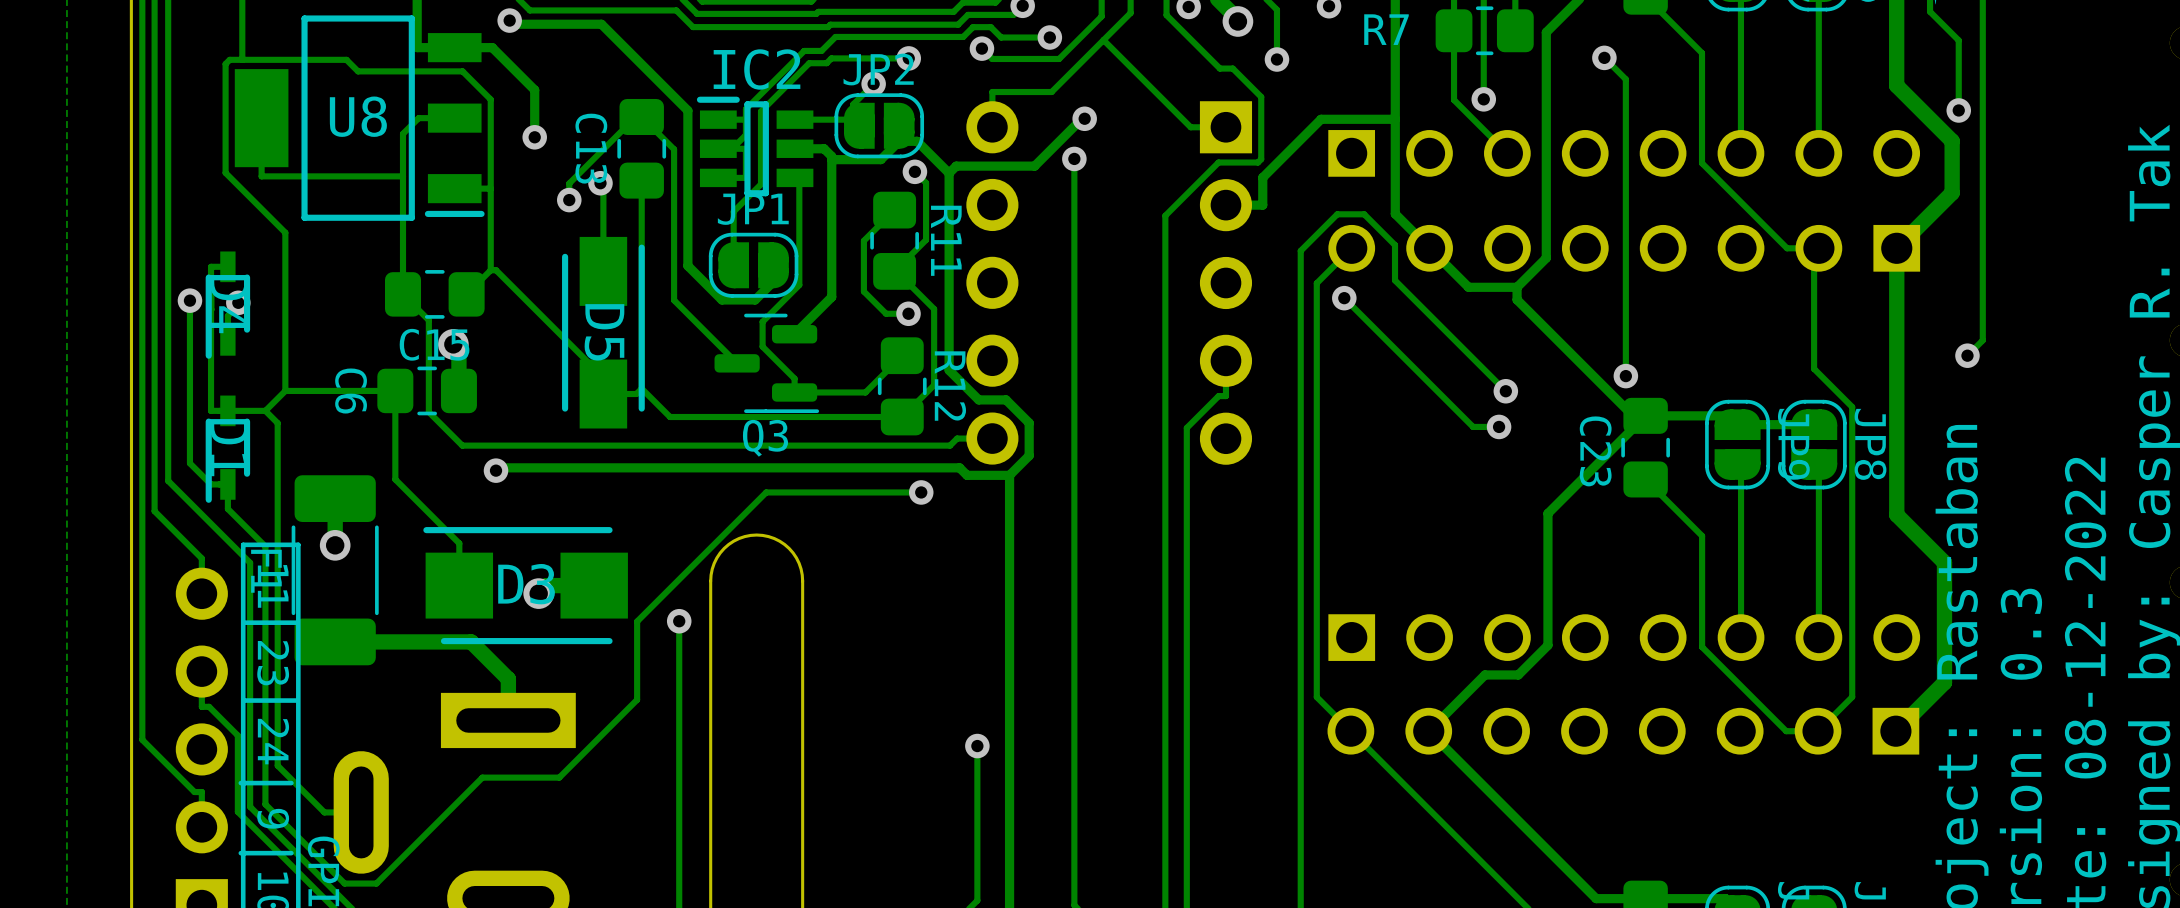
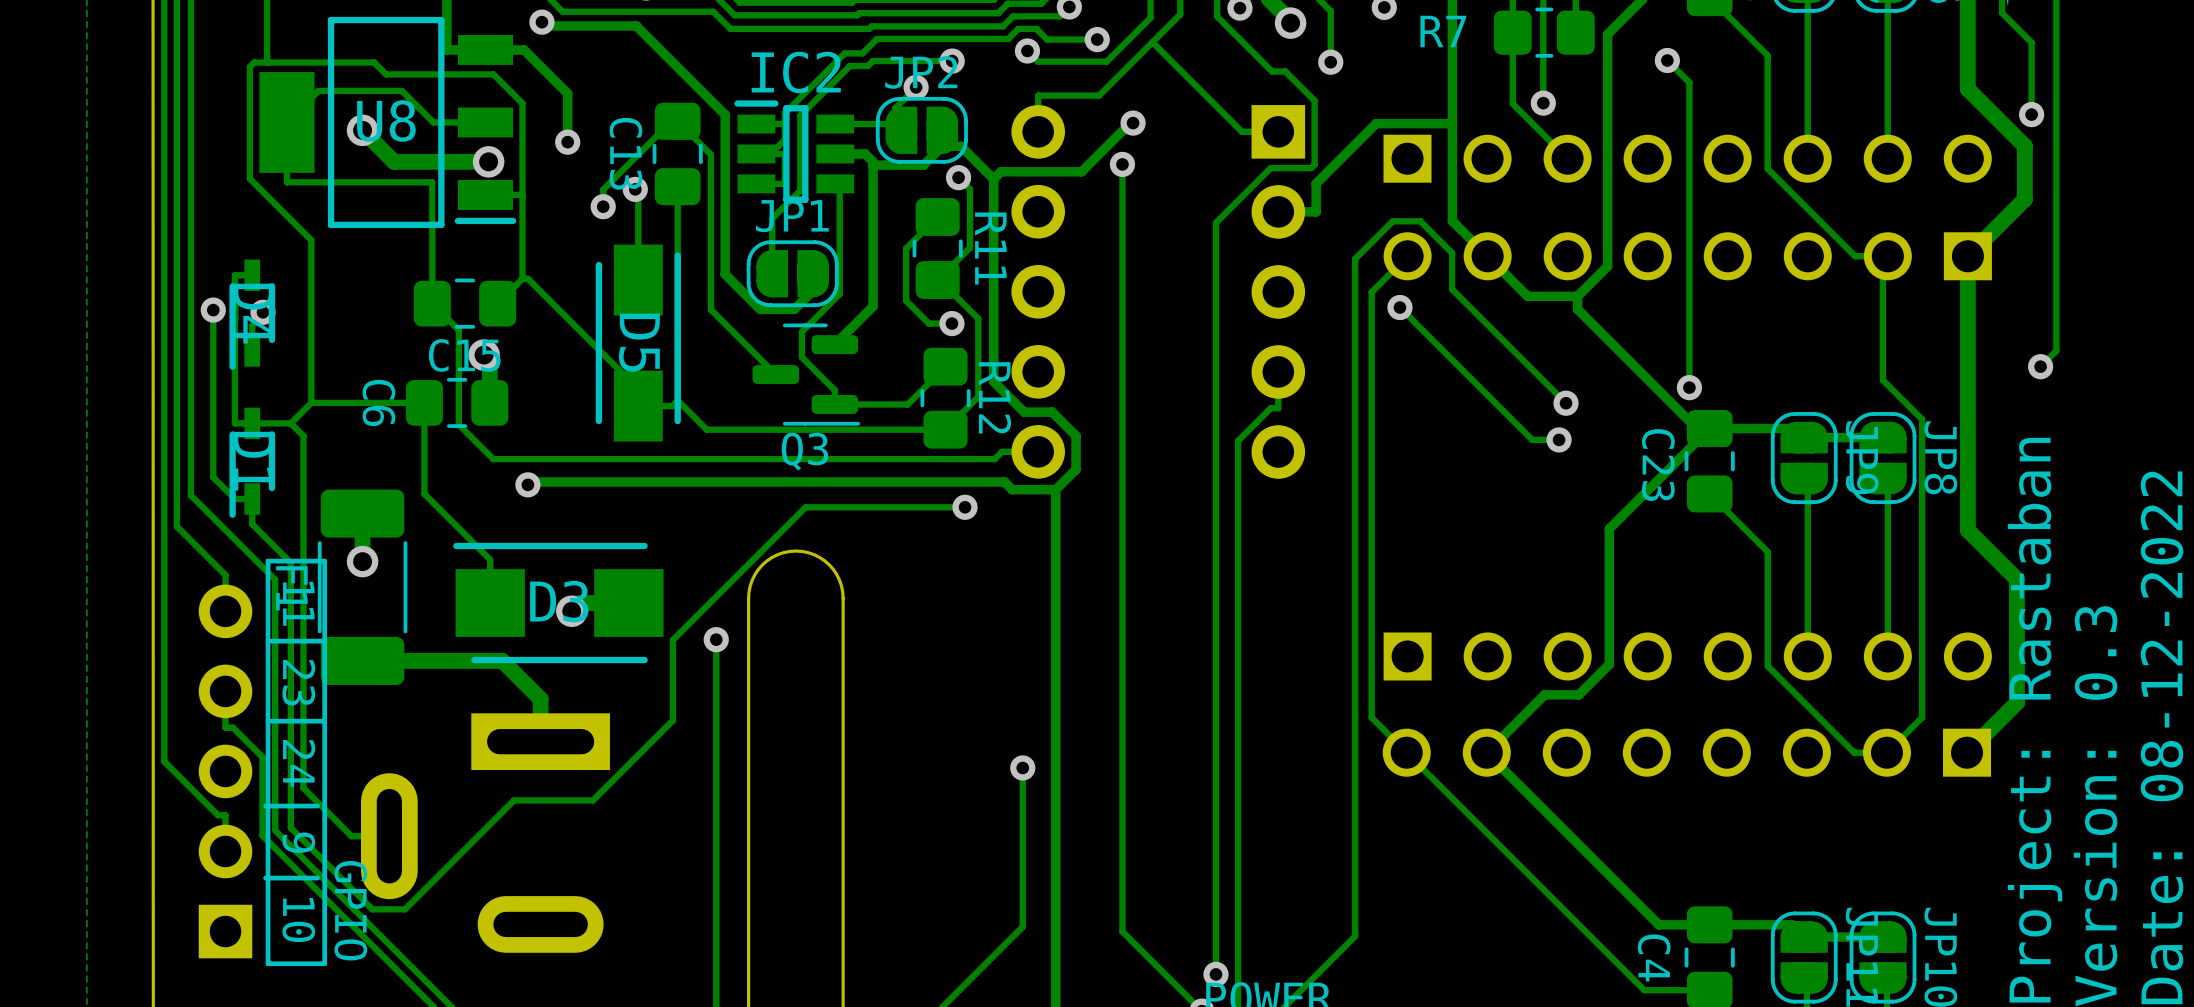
track: (418, 118) (403, 133) (403, 176) -> (448, 122) (433, 122) (401, 90) (318, 90) (286, 122)
track: none -> (362, 130) (394, 161) (480, 161) (484, 165)
via: none -> (362, 130)
via: none -> (488, 161)

